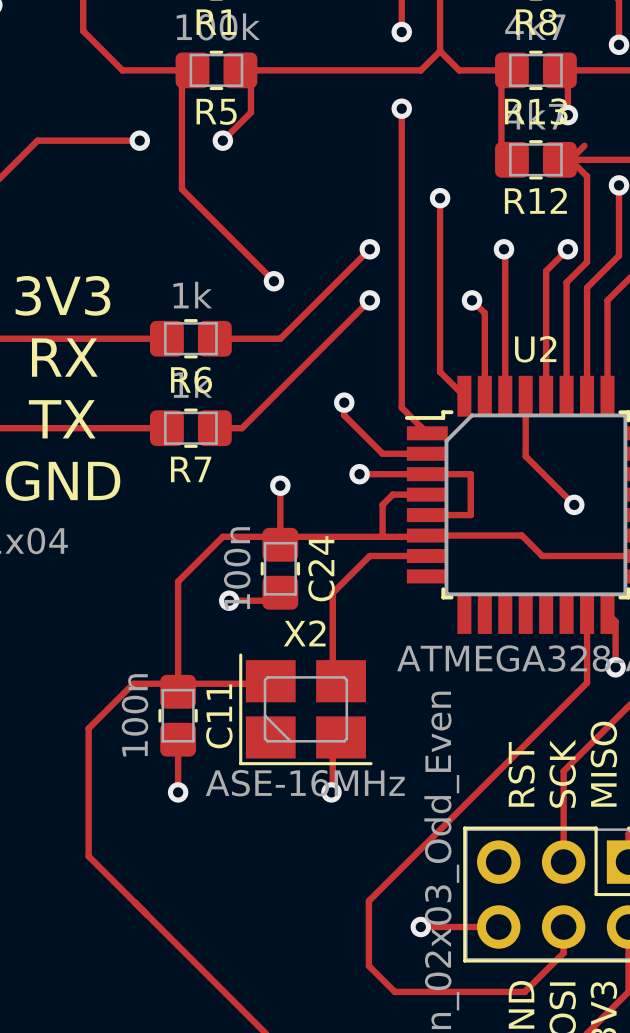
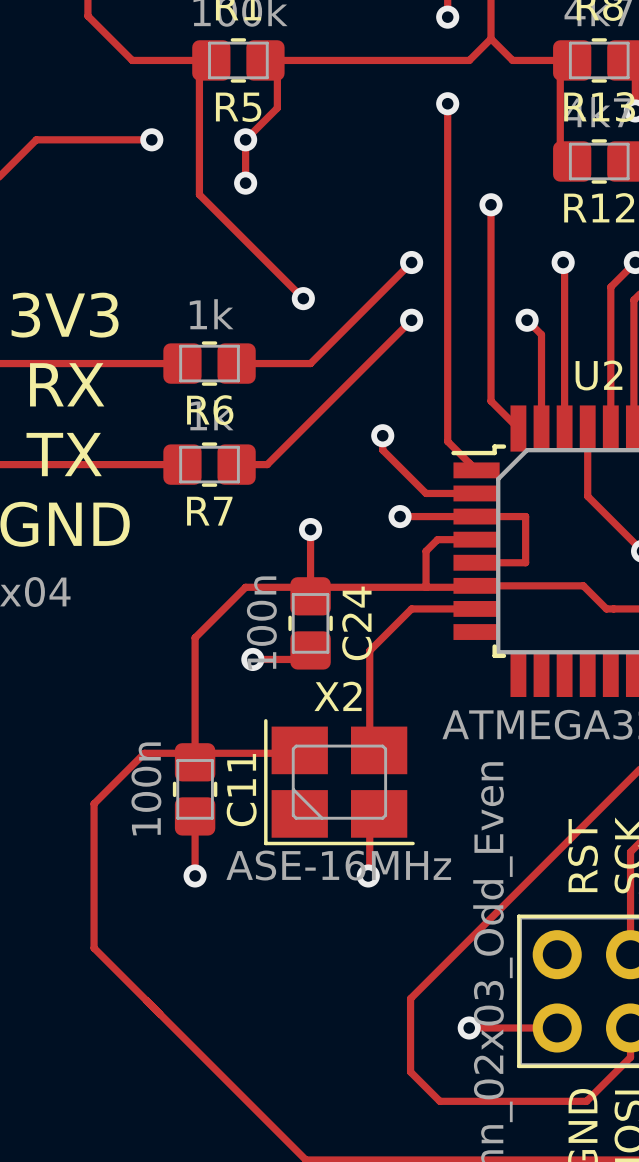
track: none -> (245, 139) (245, 183)
via: none -> (245, 183)

